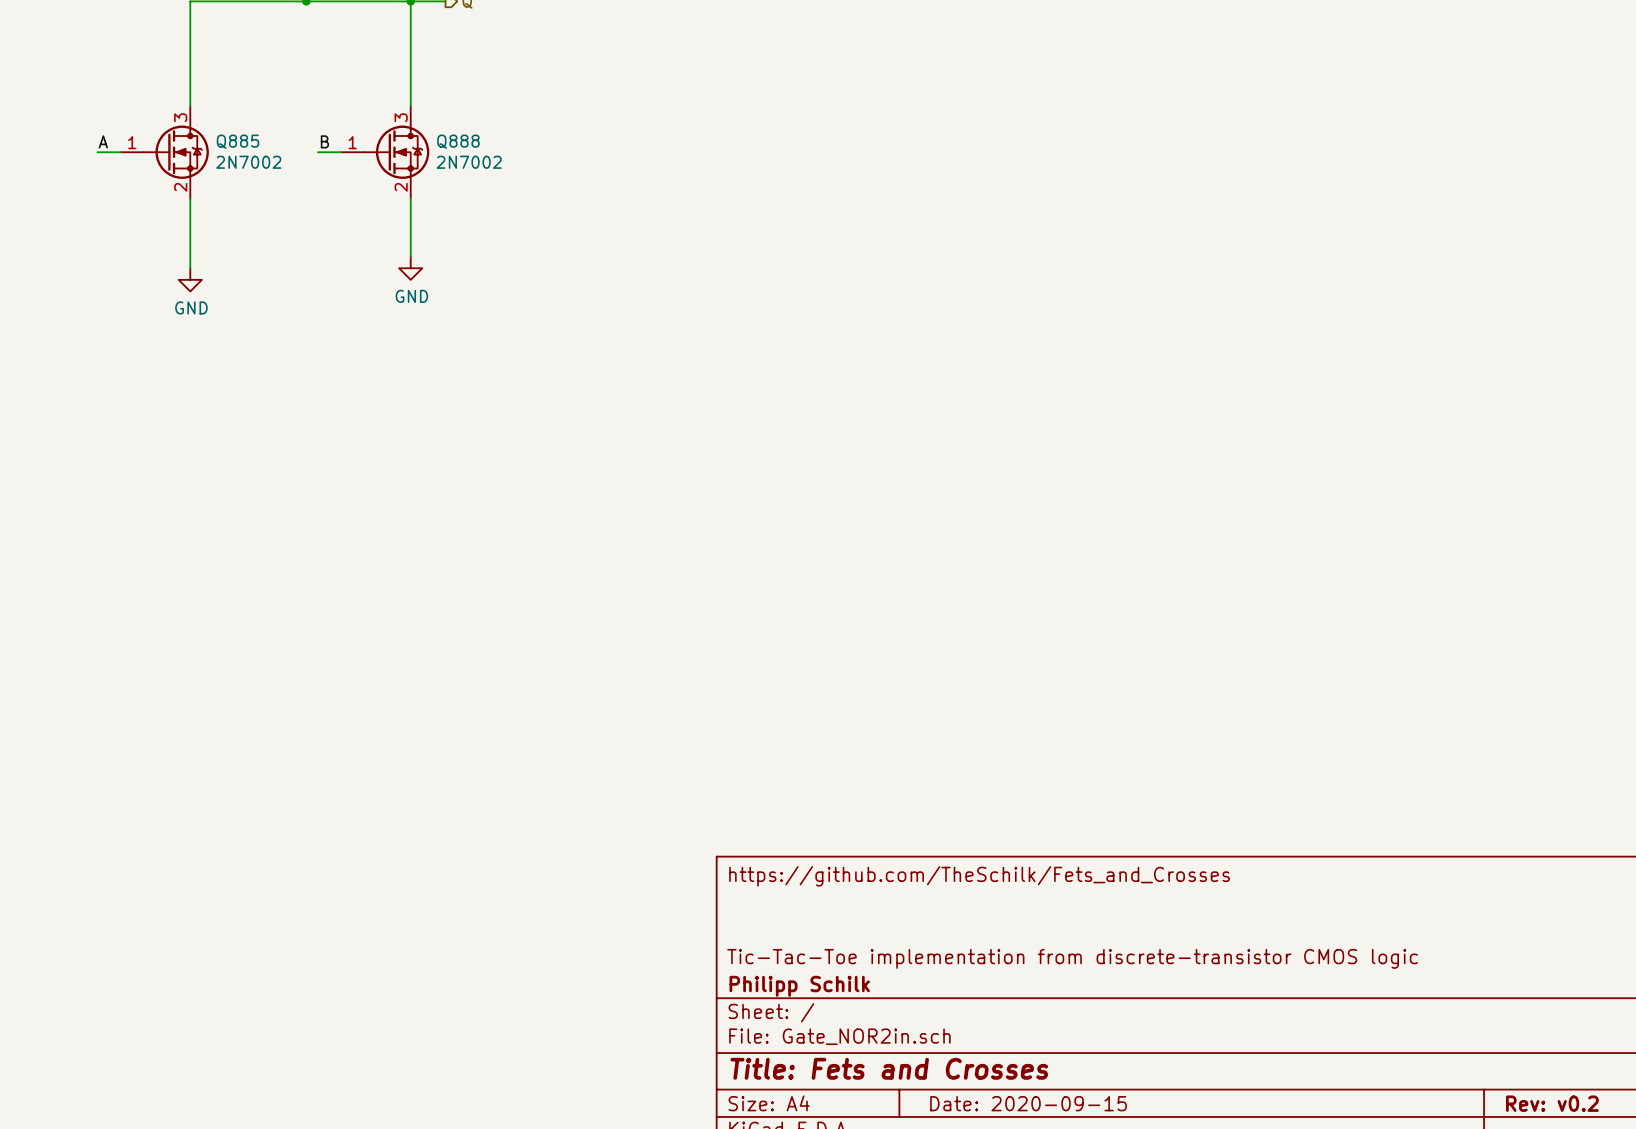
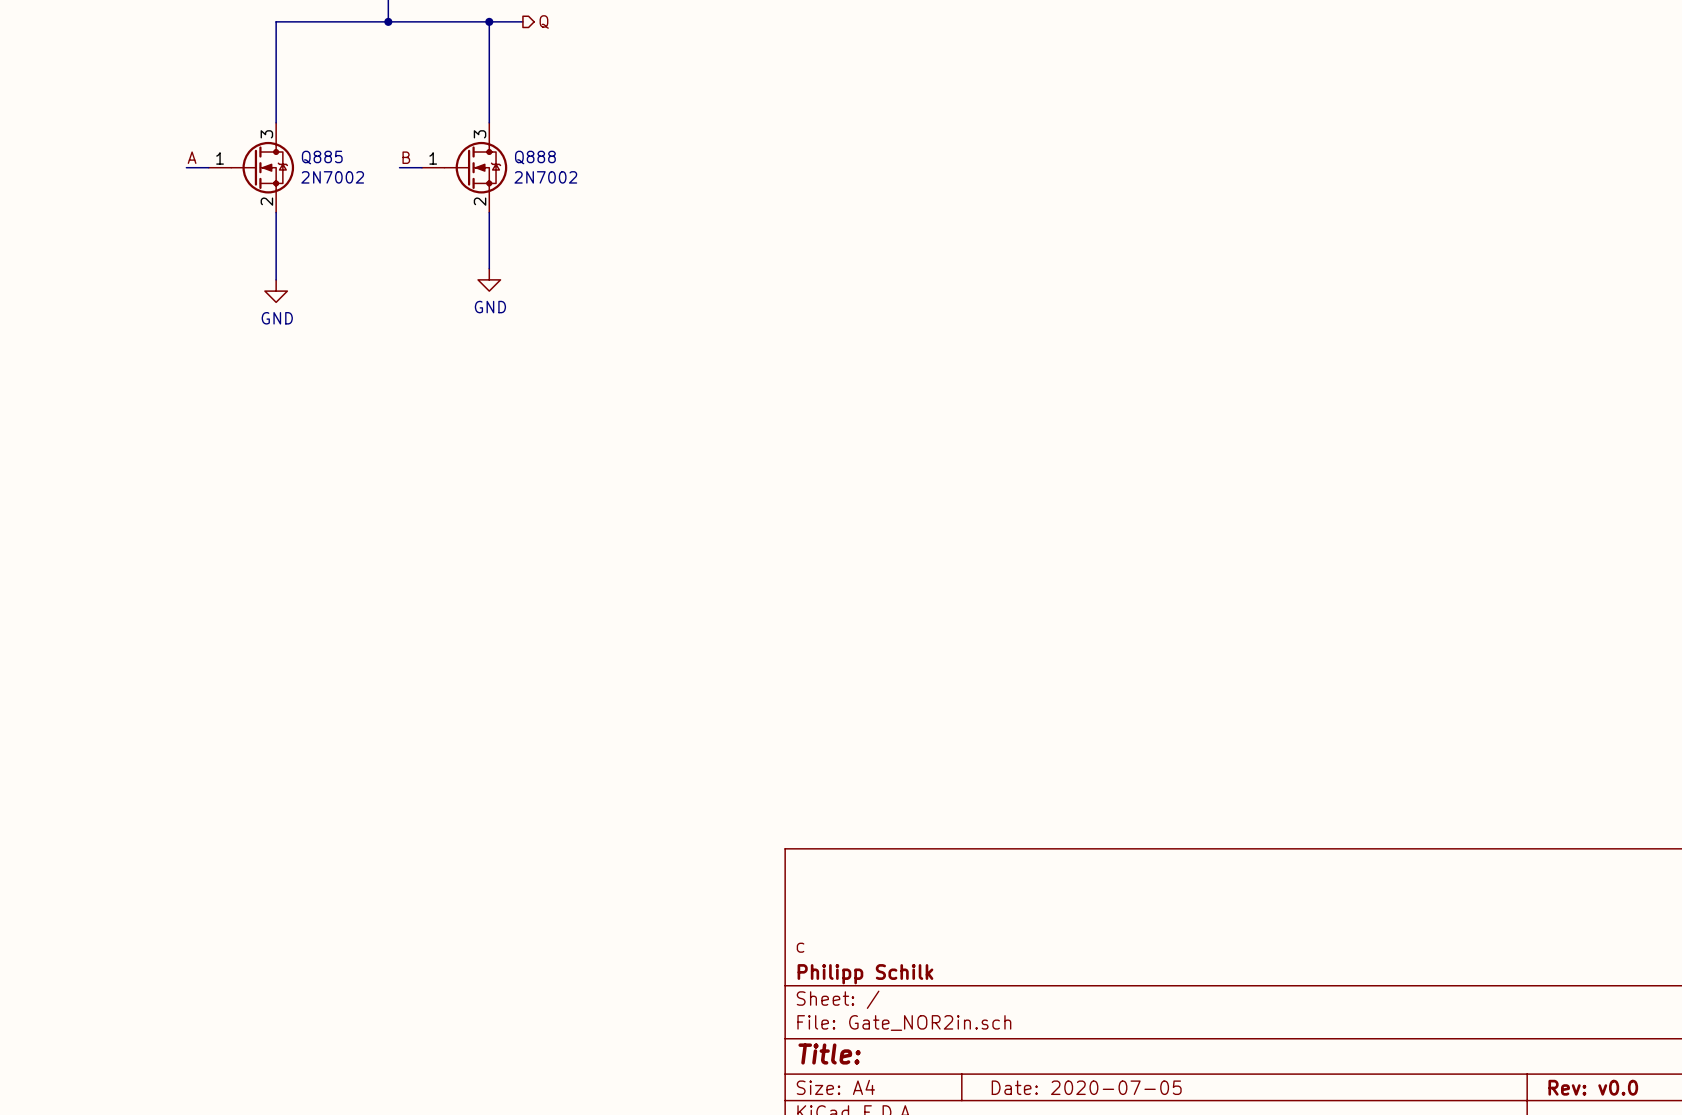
title block: https://github.com/TheSchilk/Fets_and_Crosses (979, 876) -> none
title block: Tic-Tac-Toe implementation from discrete-transistor CMOS logic (1072, 958) -> c (800, 947)
title block: Title: Fets and Crosses (889, 1068) -> Title: (829, 1054)
title block: Date: 2020-09-15 (1028, 1103) -> Date: 2020-07-05 (1086, 1087)
title block: Rev: v0.2 (1552, 1103) -> Rev: v0.0 (1593, 1087)

